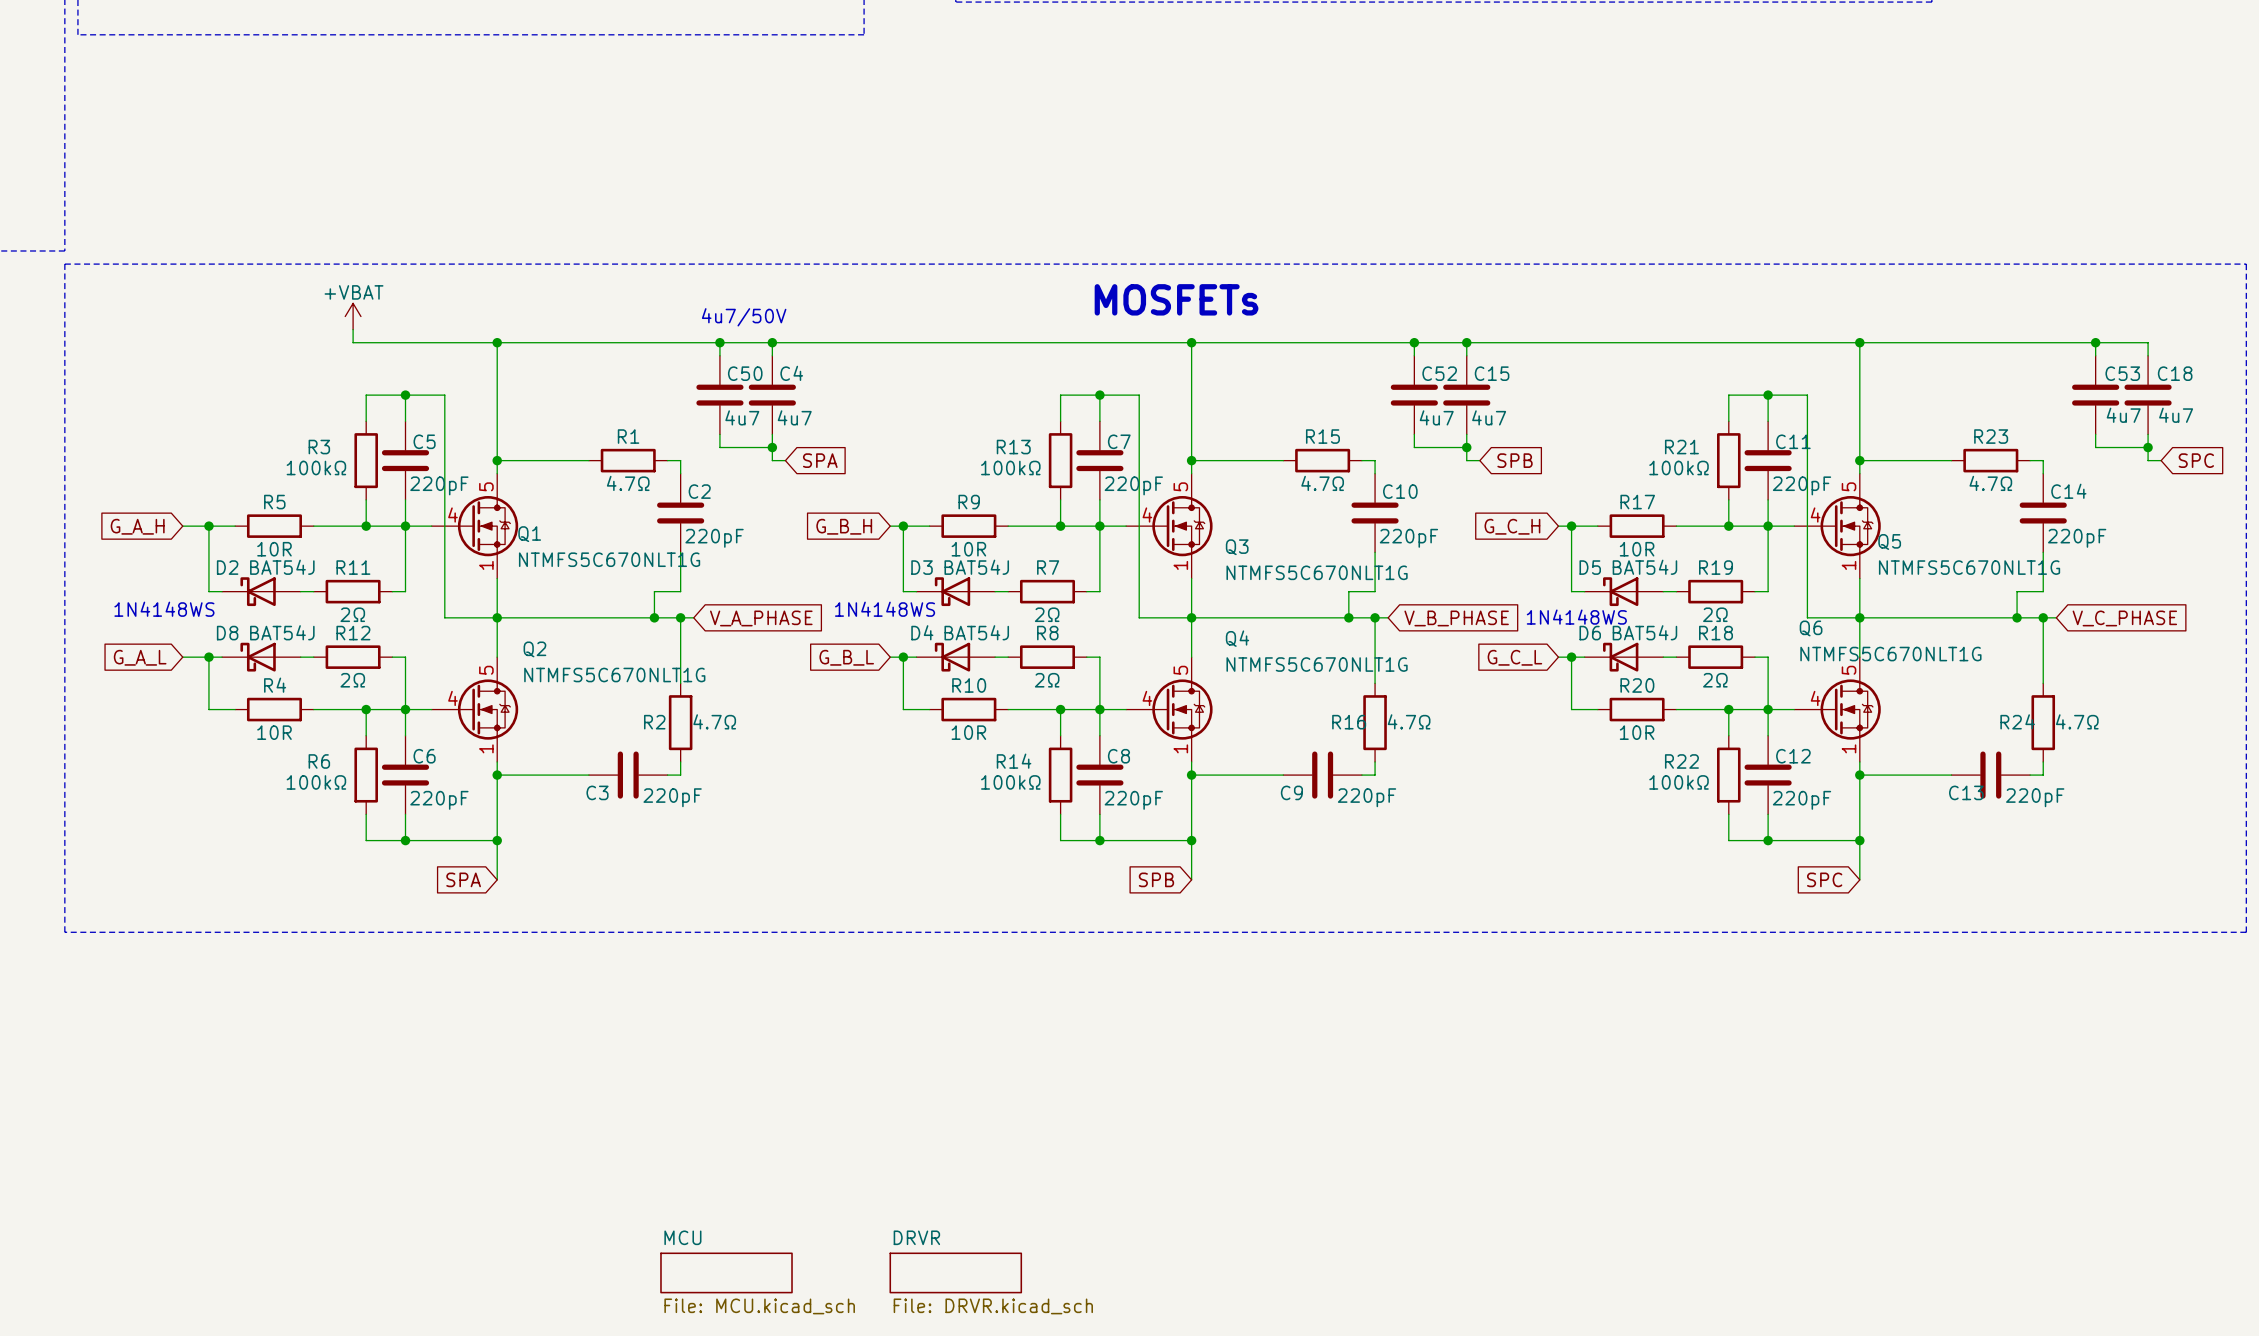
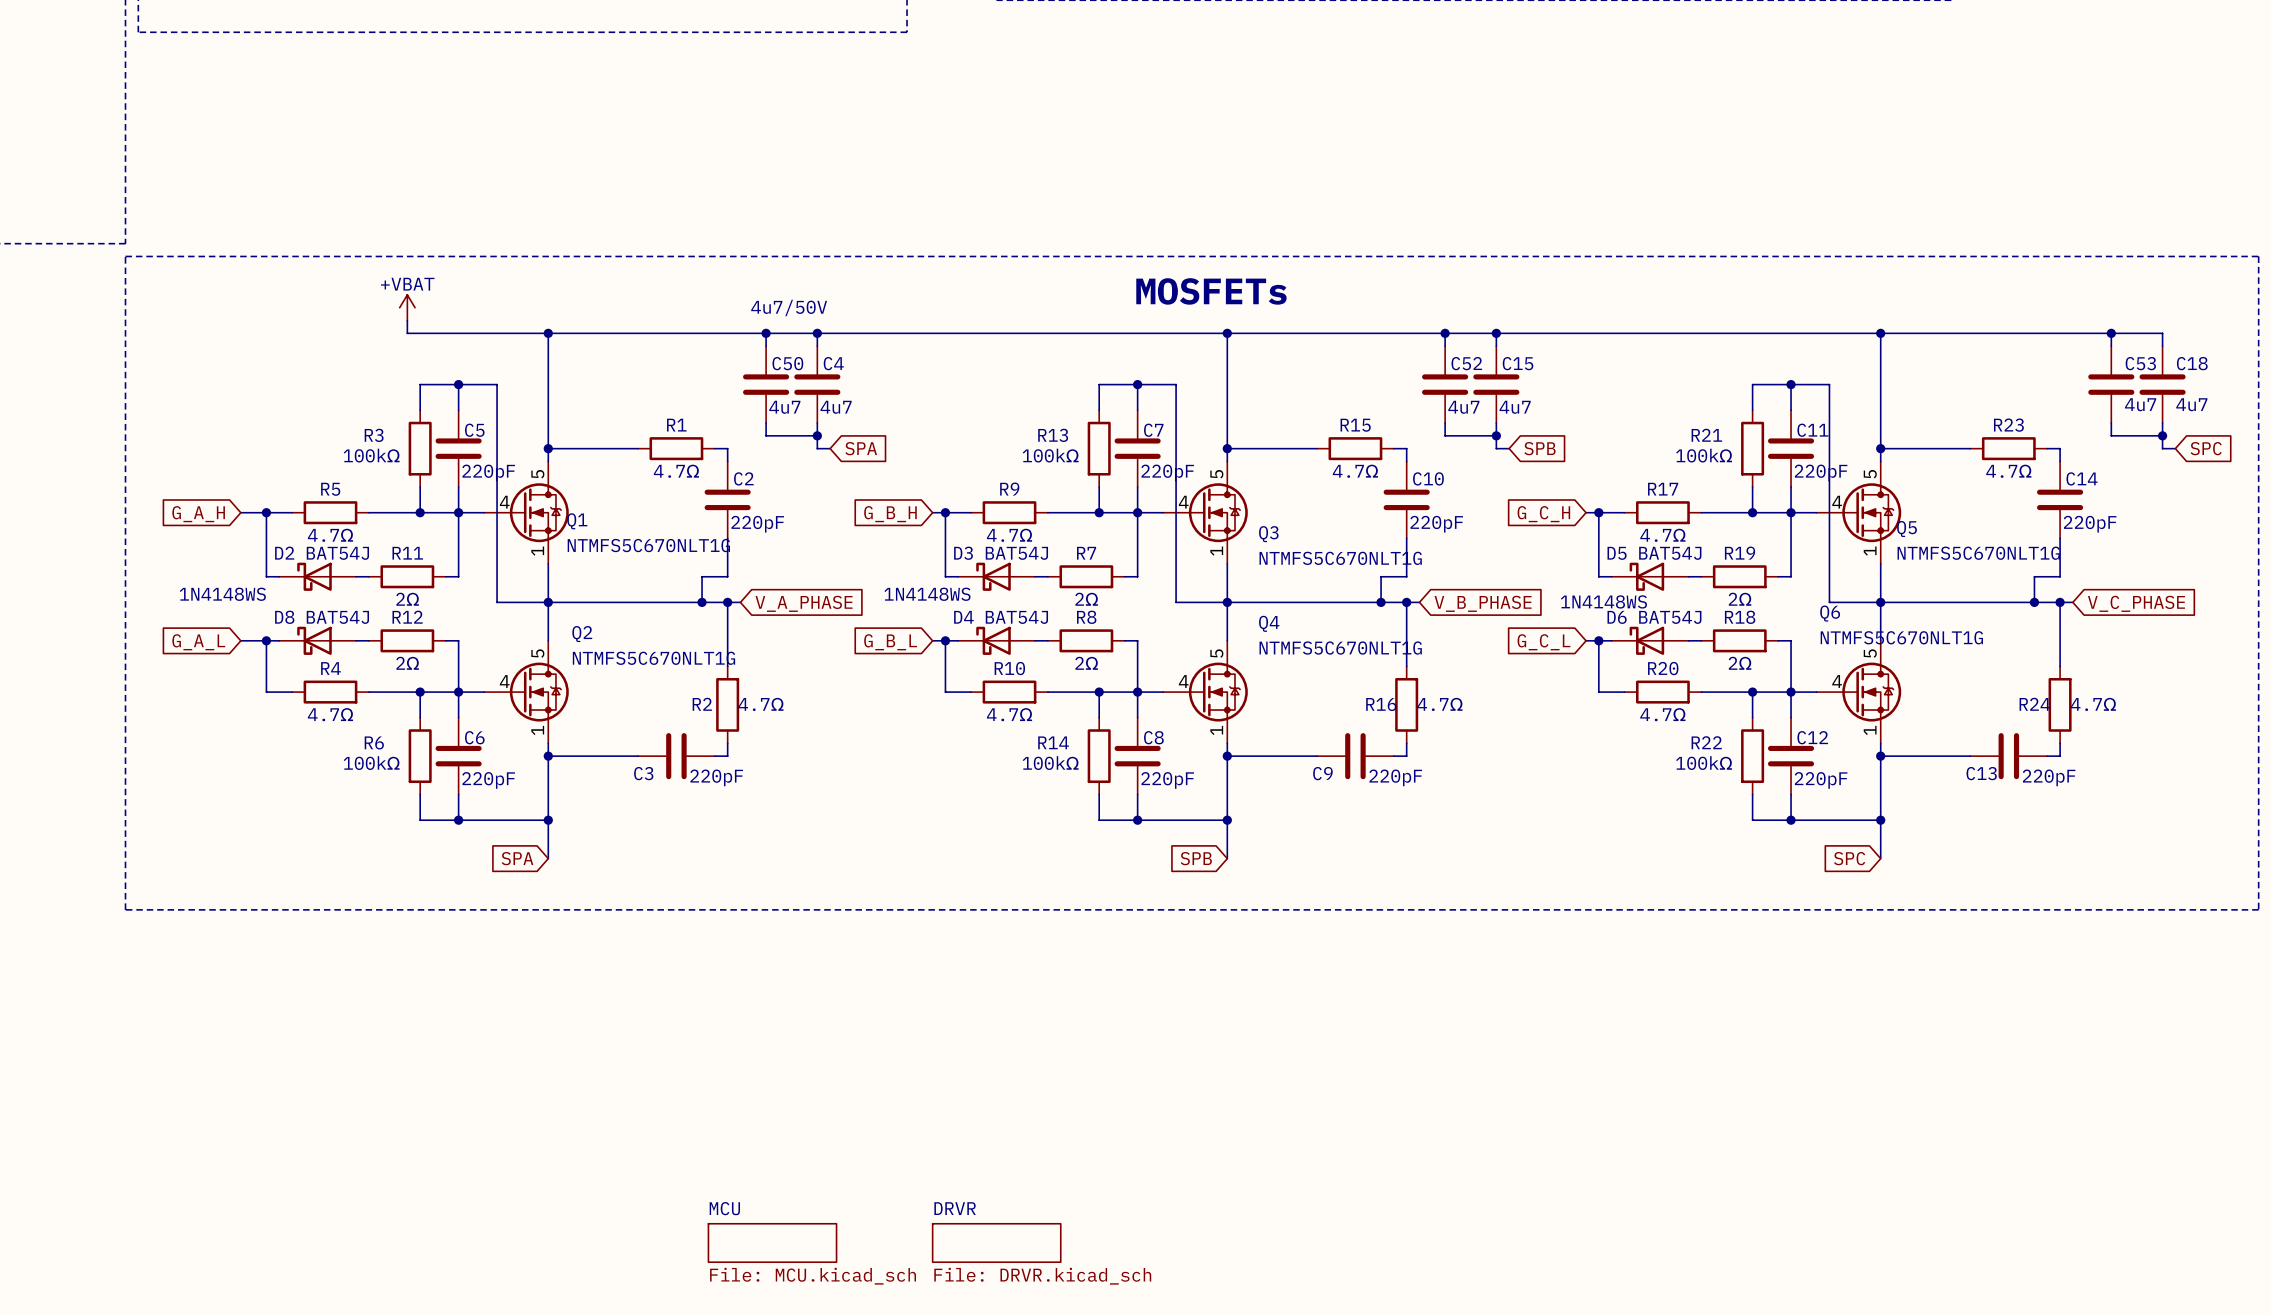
R5 value: 10R (274, 549) -> 4.7Ω (330, 535)
R9 value: 10R (968, 549) -> 4.7Ω (1009, 535)
R17 value: 10R (1637, 549) -> 4.7Ω (1662, 535)
R4 value: 10R (274, 732) -> 4.7Ω (330, 714)
R10 value: 10R (968, 732) -> 4.7Ω (1009, 714)
R20 value: 10R (1637, 732) -> 4.7Ω (1662, 714)

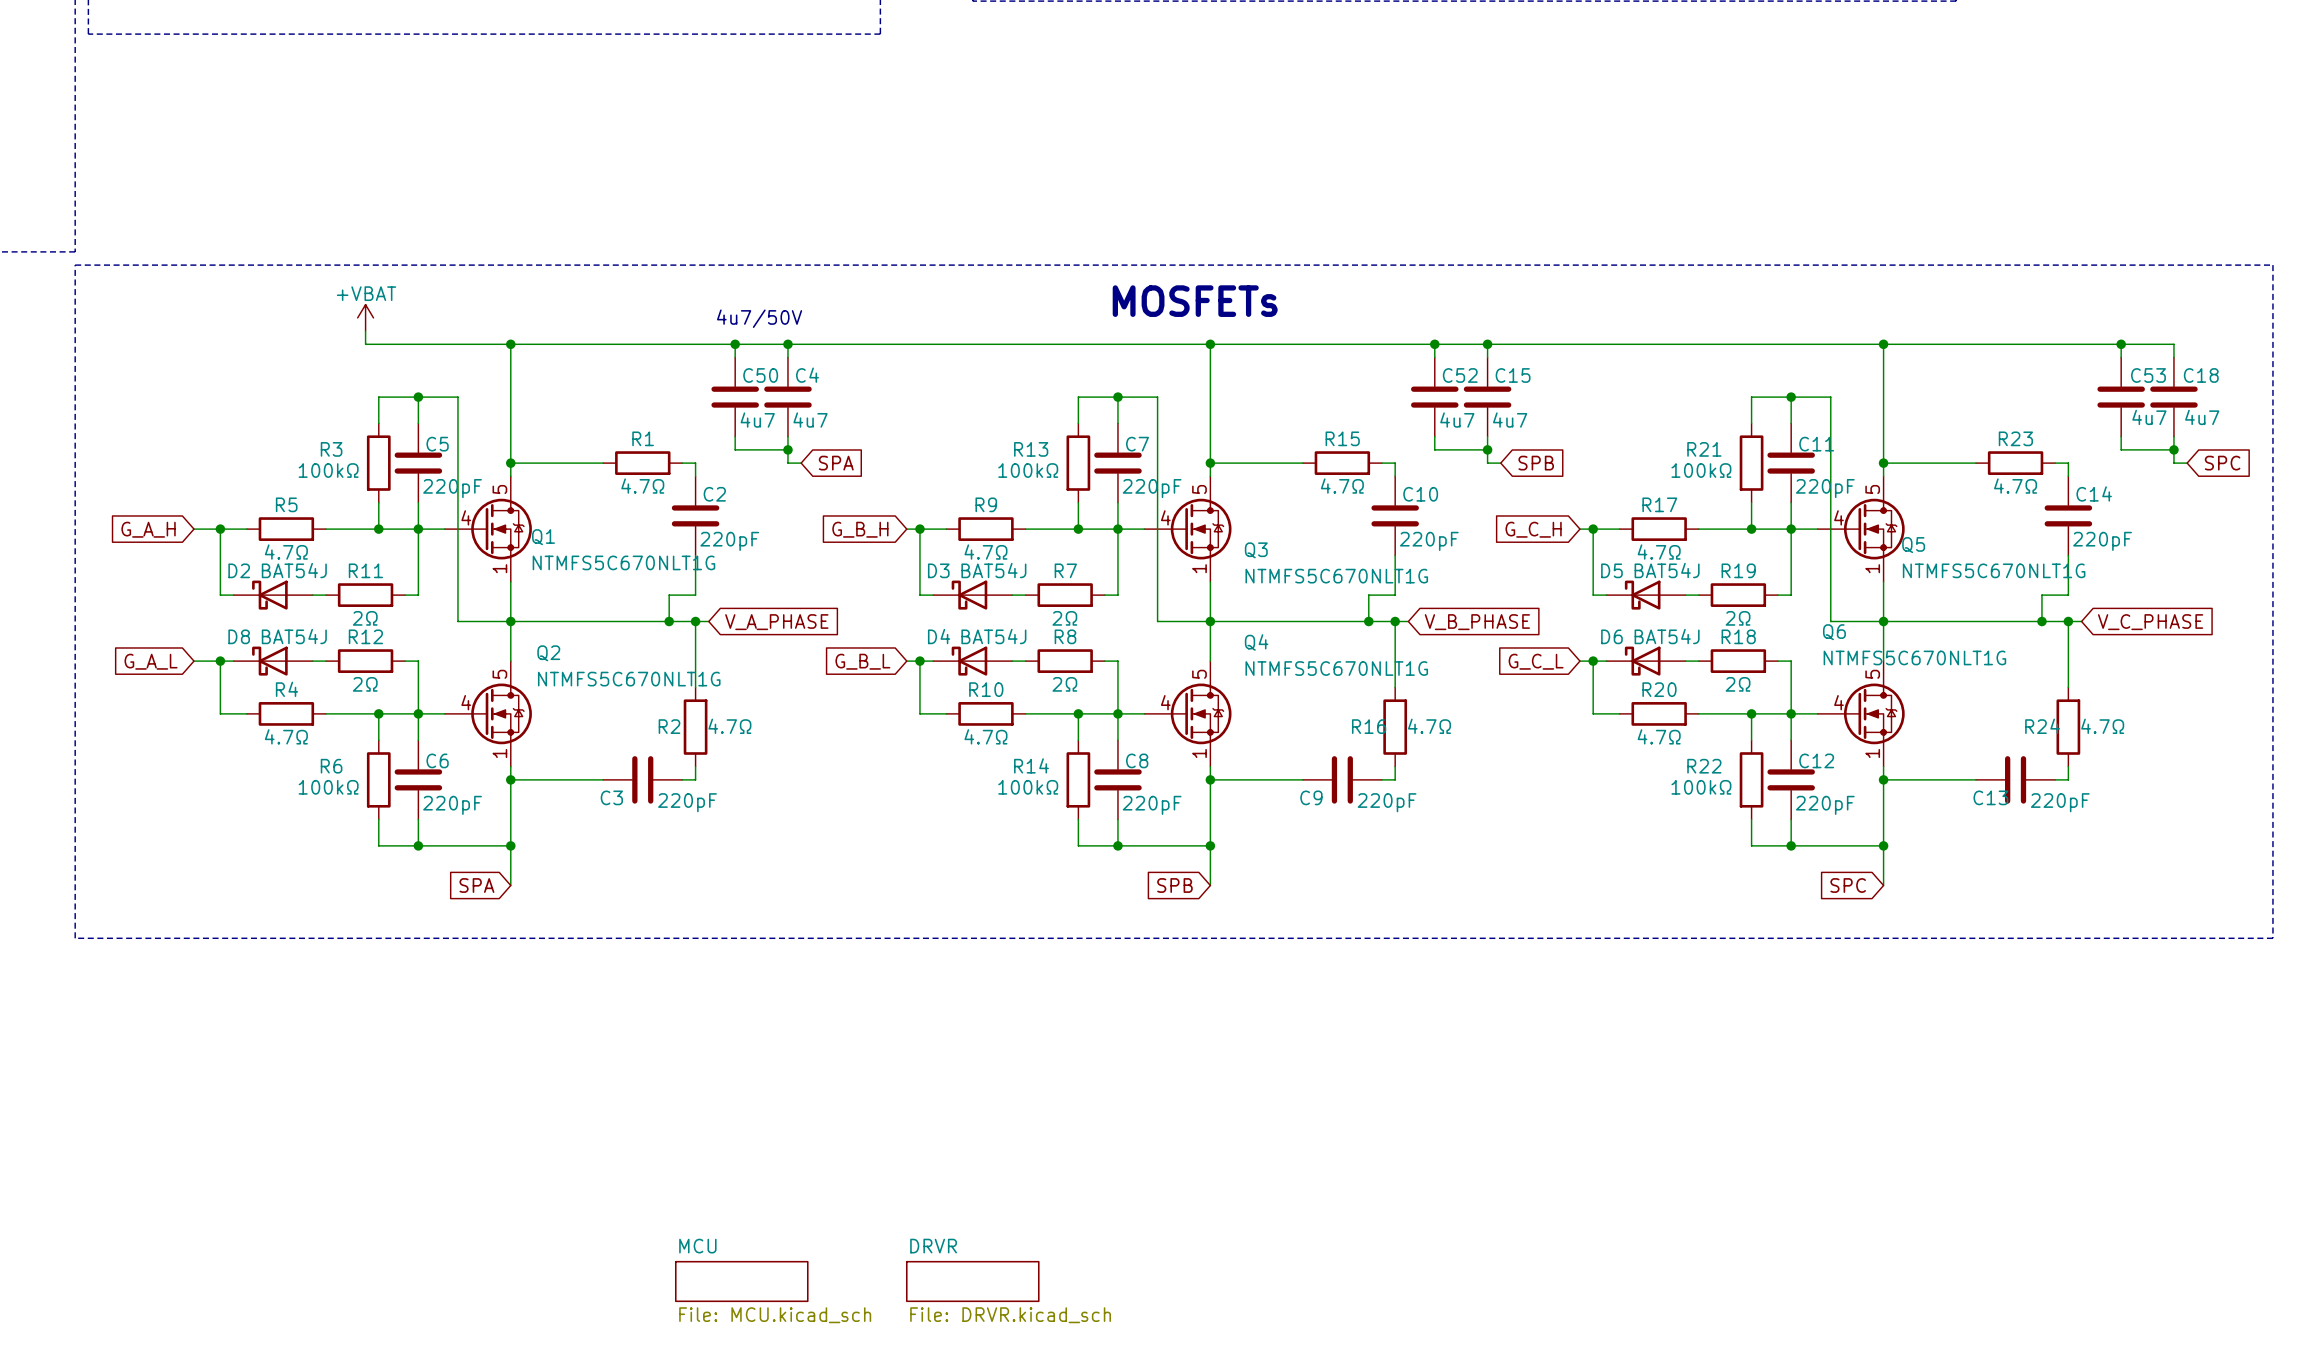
text: 1N4148WS (222, 594) -> none
text: 1N4148WS (927, 594) -> none
text: 1N4148WS (1603, 601) -> none

